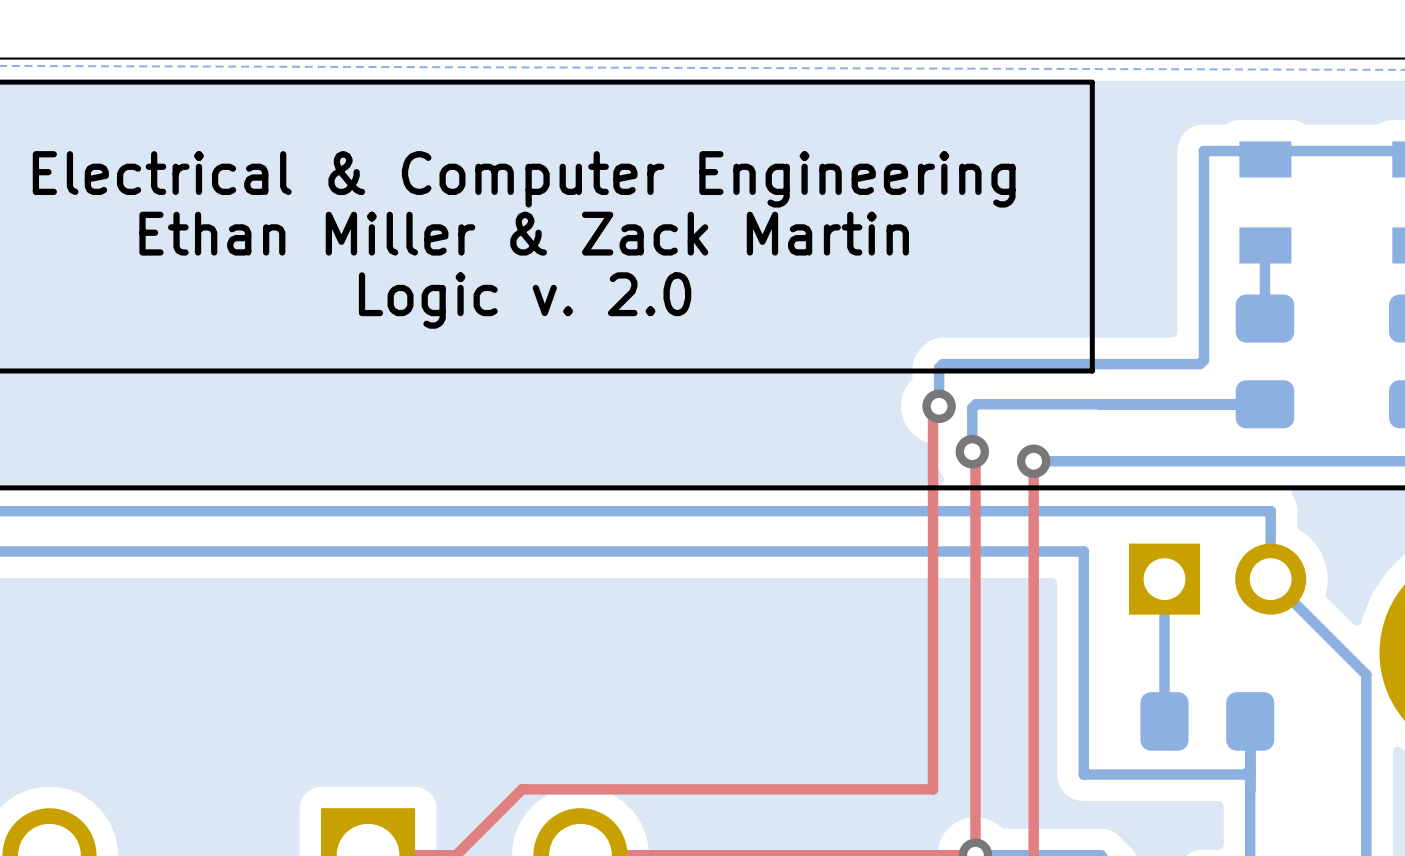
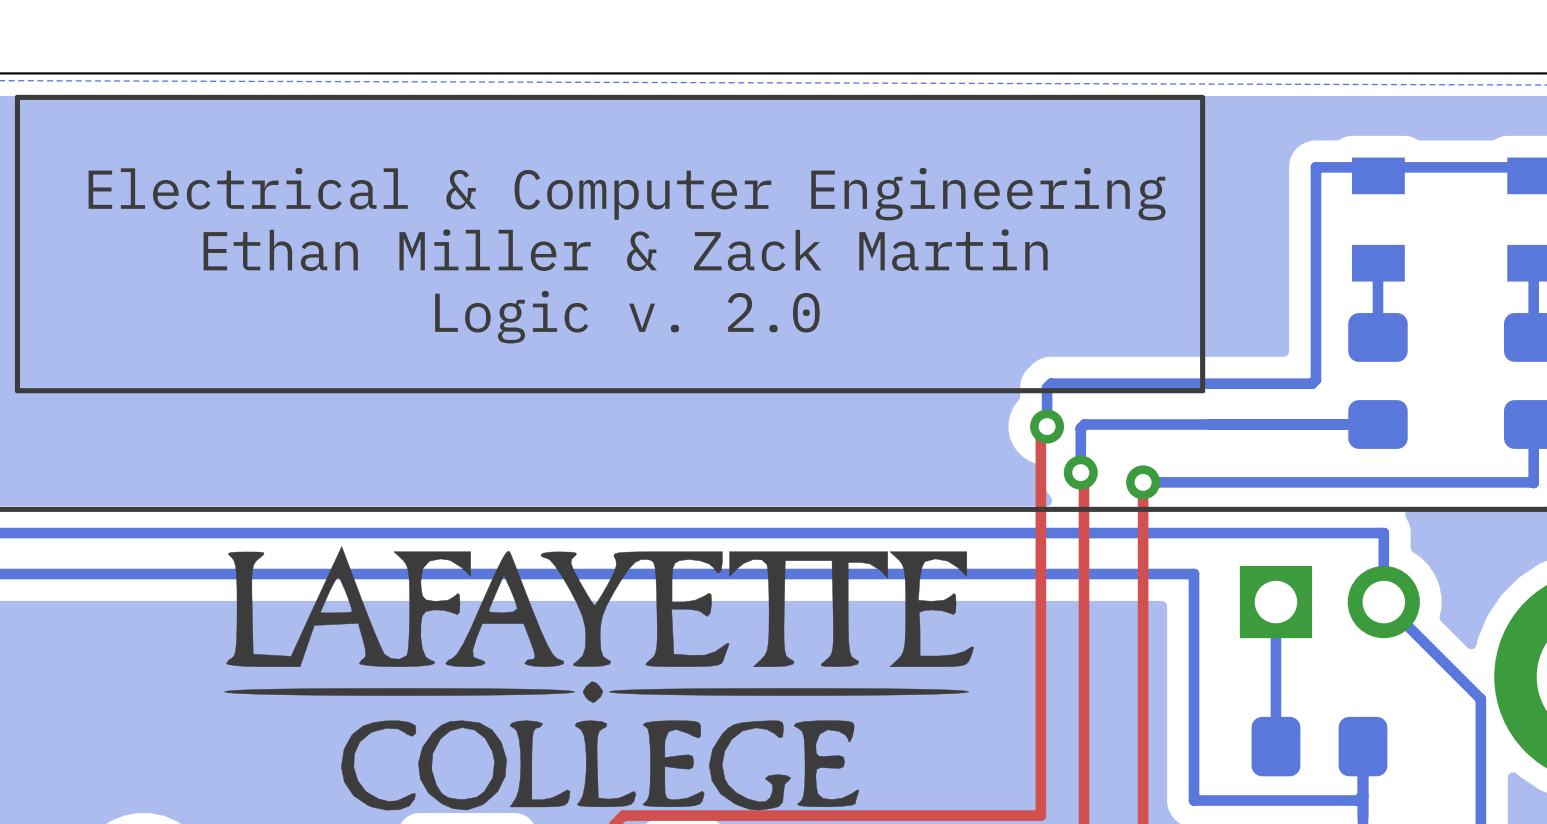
drawing: none -> [224, 546, 974, 811]

